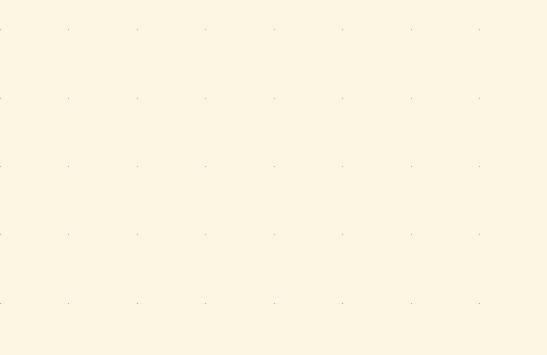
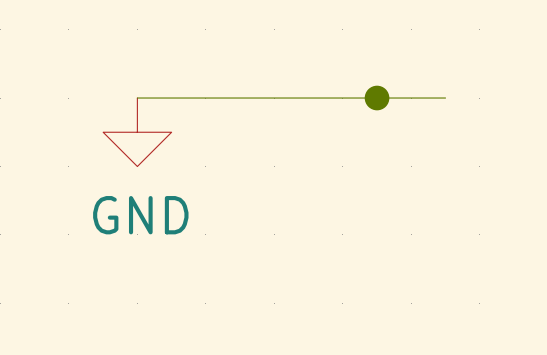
wire: none -> (137, 98) (445, 98)
junction: none -> (377, 98)
power symbol: none -> GND (137, 132)

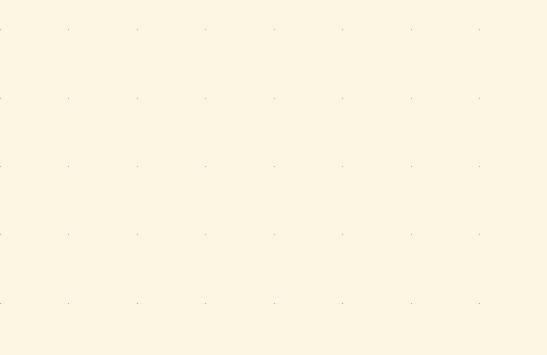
wire: (137, 98) (445, 98) -> none
junction: (377, 98) -> none
power symbol: GND (137, 132) -> none

